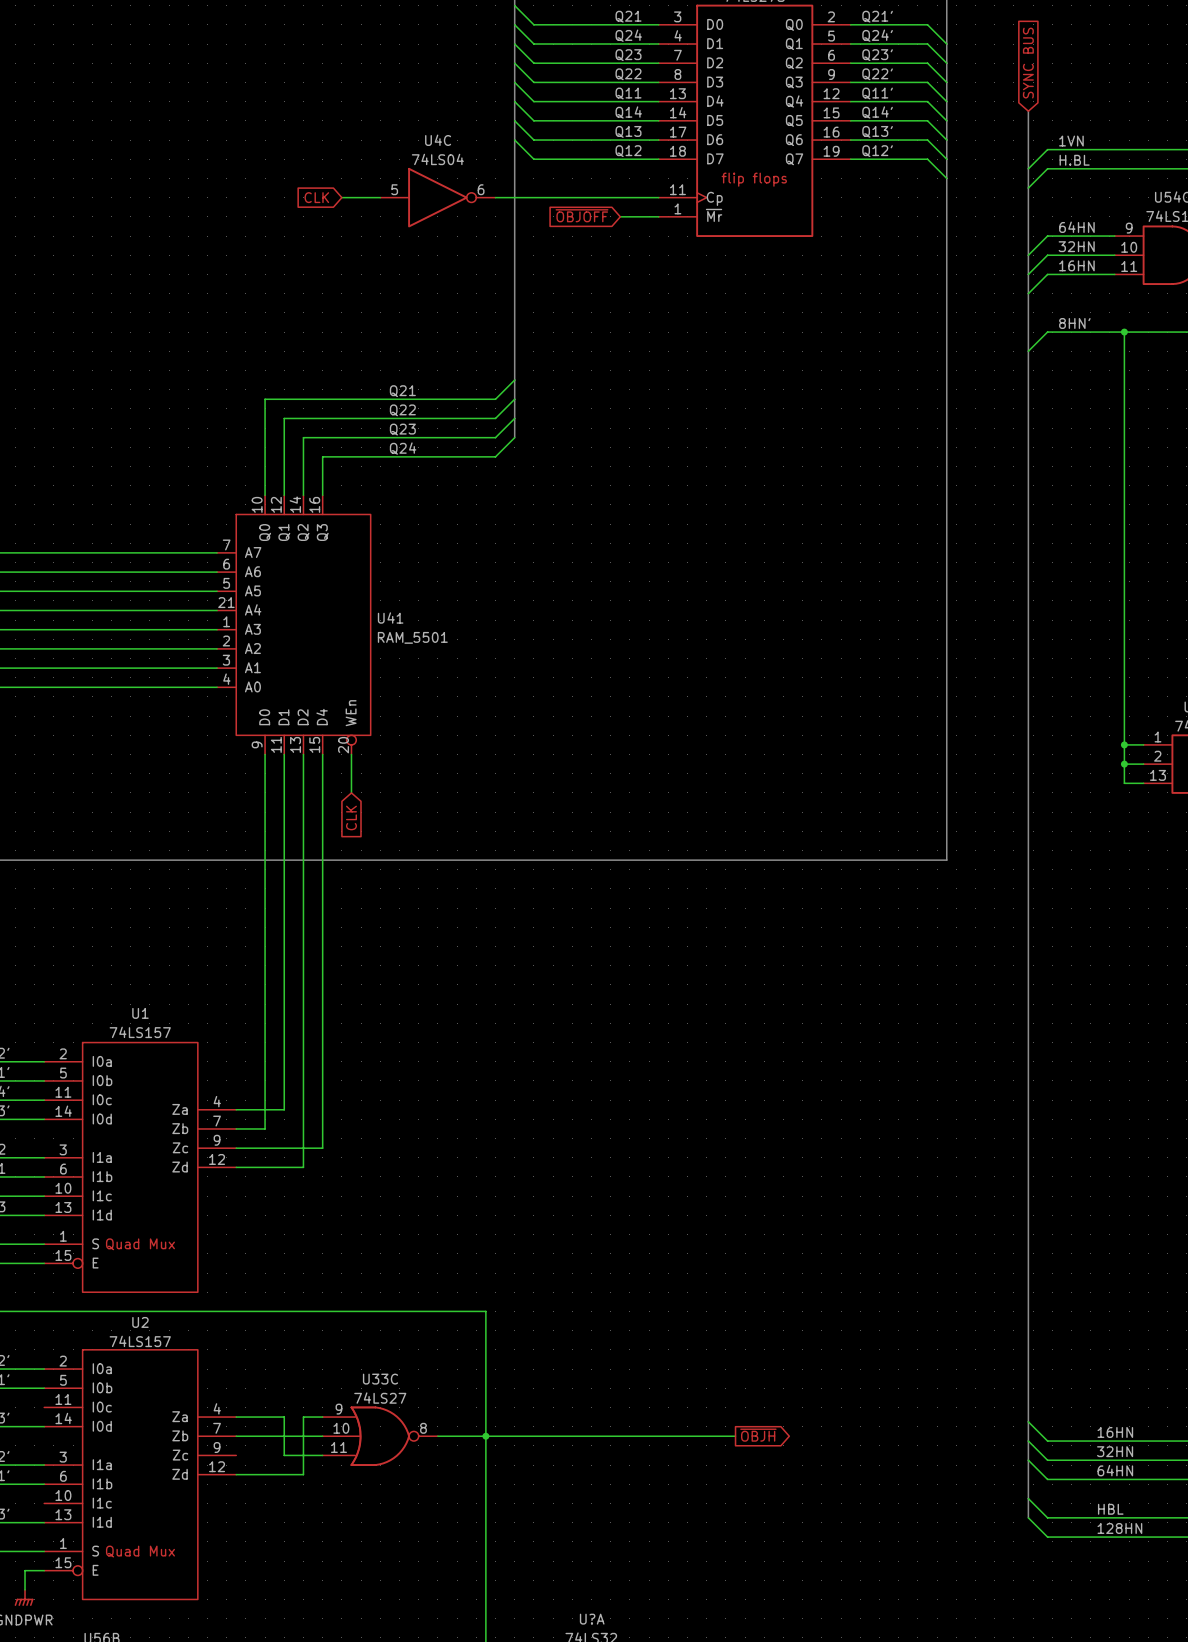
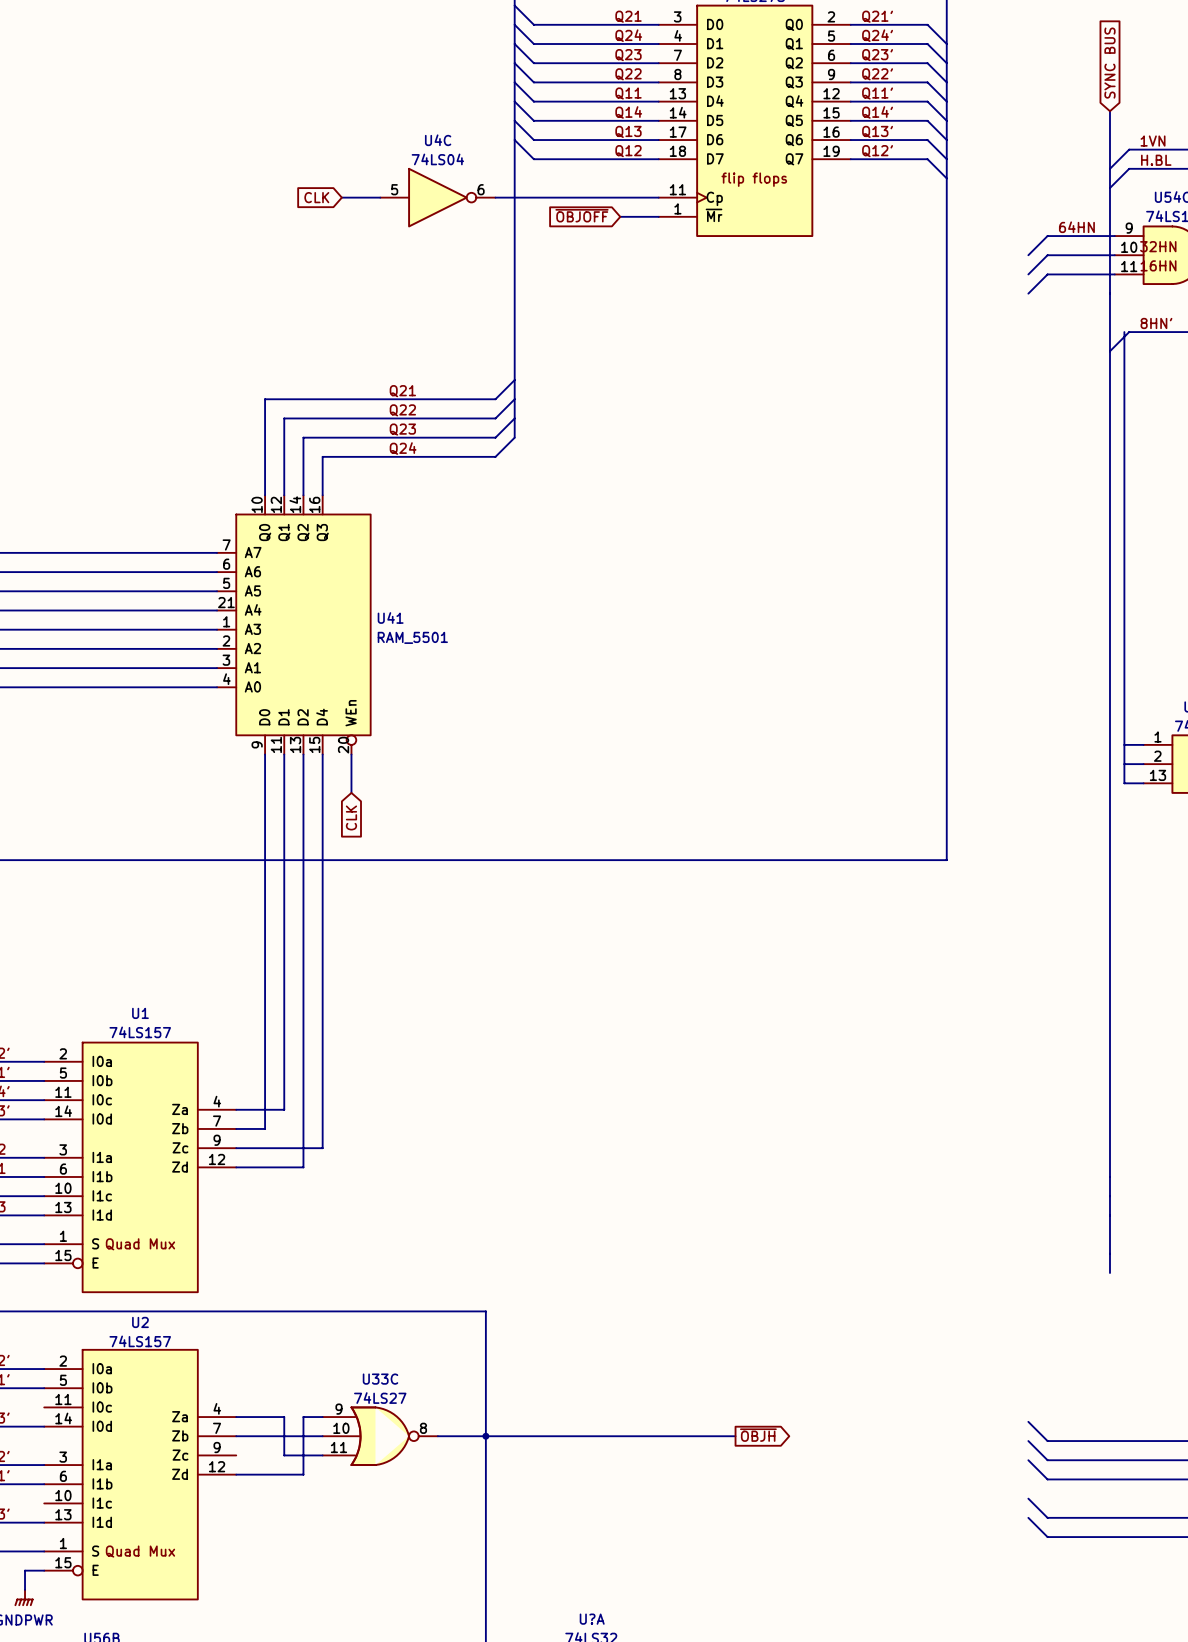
global label position: SYNC BUS (1028, 63) -> SYNC BUS (1109, 63)
bus: (1028, 111) (1028, 1517) -> none
bus: none -> (1109, 111) (1109, 1273)
label position: 1VN (1071, 141) -> 1VN (1153, 141)
wire: (1129, 149) (1047, 149) (1028, 168) -> (1129, 149) (1109, 168)
label position: H.BL (1074, 160) -> H.BL (1156, 160)
wire: (1129, 168) (1047, 168) (1028, 188) -> (1129, 168) (1109, 188)
label position: 32HN (1076, 246) -> 32HN (1158, 246)
label position: 16HN (1076, 265) -> 16HN (1158, 265)
label position: 8HN' (1074, 323) -> 8HN' (1156, 323)
junction: (1124, 332) -> none
wire: (1129, 332) (1047, 332) (1028, 351) -> (1129, 332) (1109, 351)
junction: (1124, 744) -> none
junction: (1124, 764) -> none
label: 16HN (1115, 1432) -> none
label: 32HN (1115, 1451) -> none
label: 64HN (1115, 1470) -> none
label: HBL (1110, 1509) -> none
label: 128HN (1119, 1528) -> none

